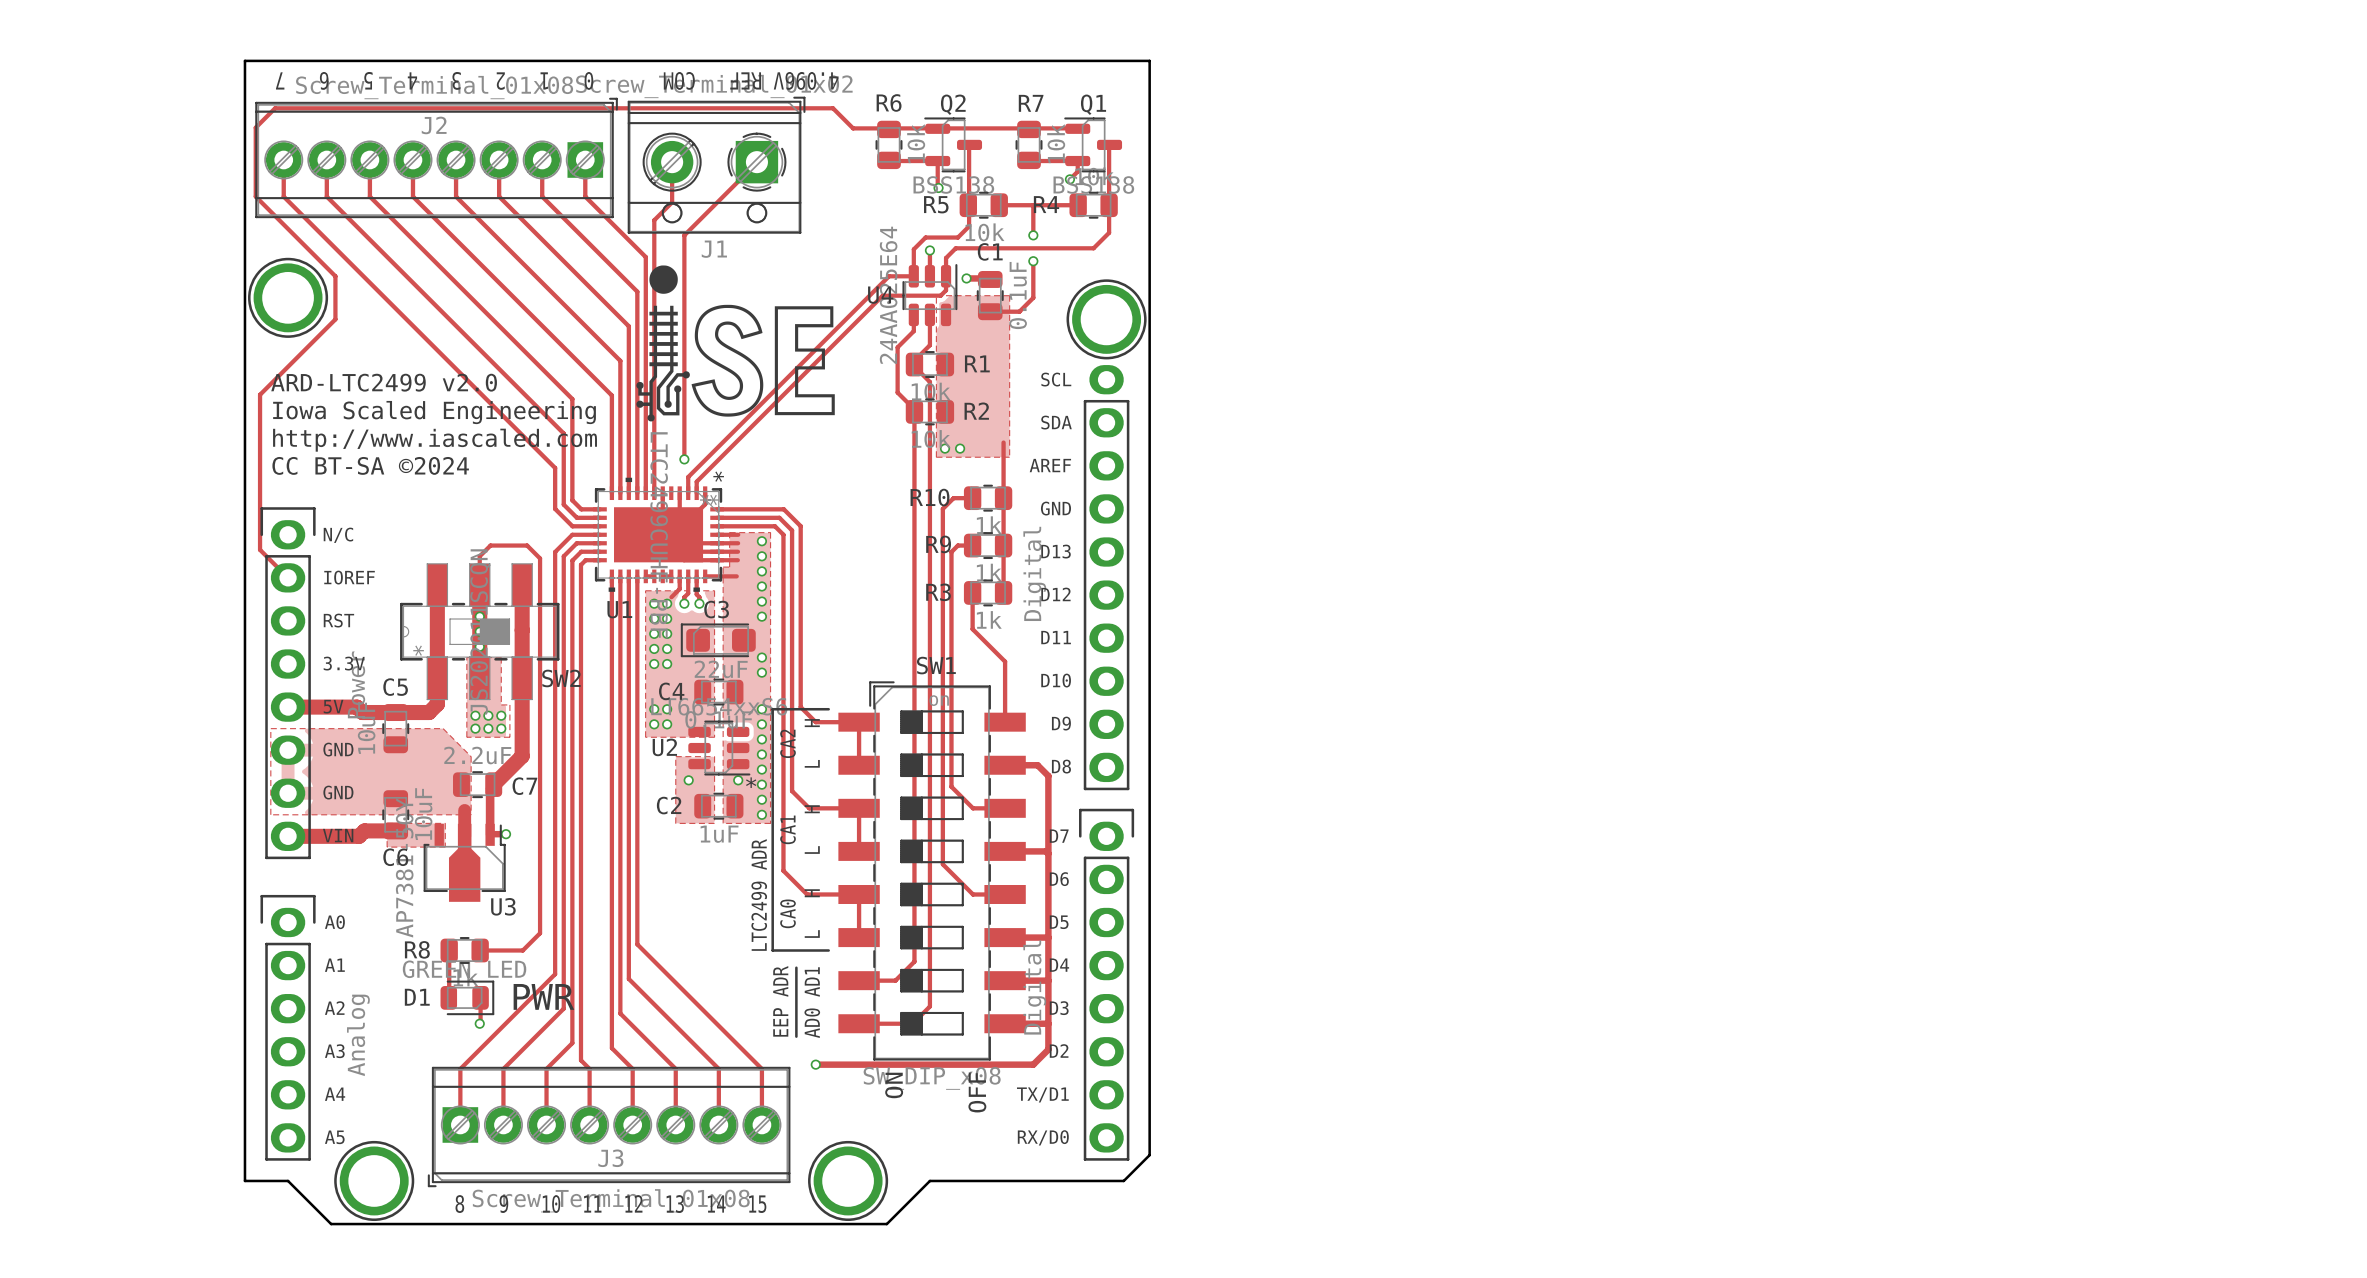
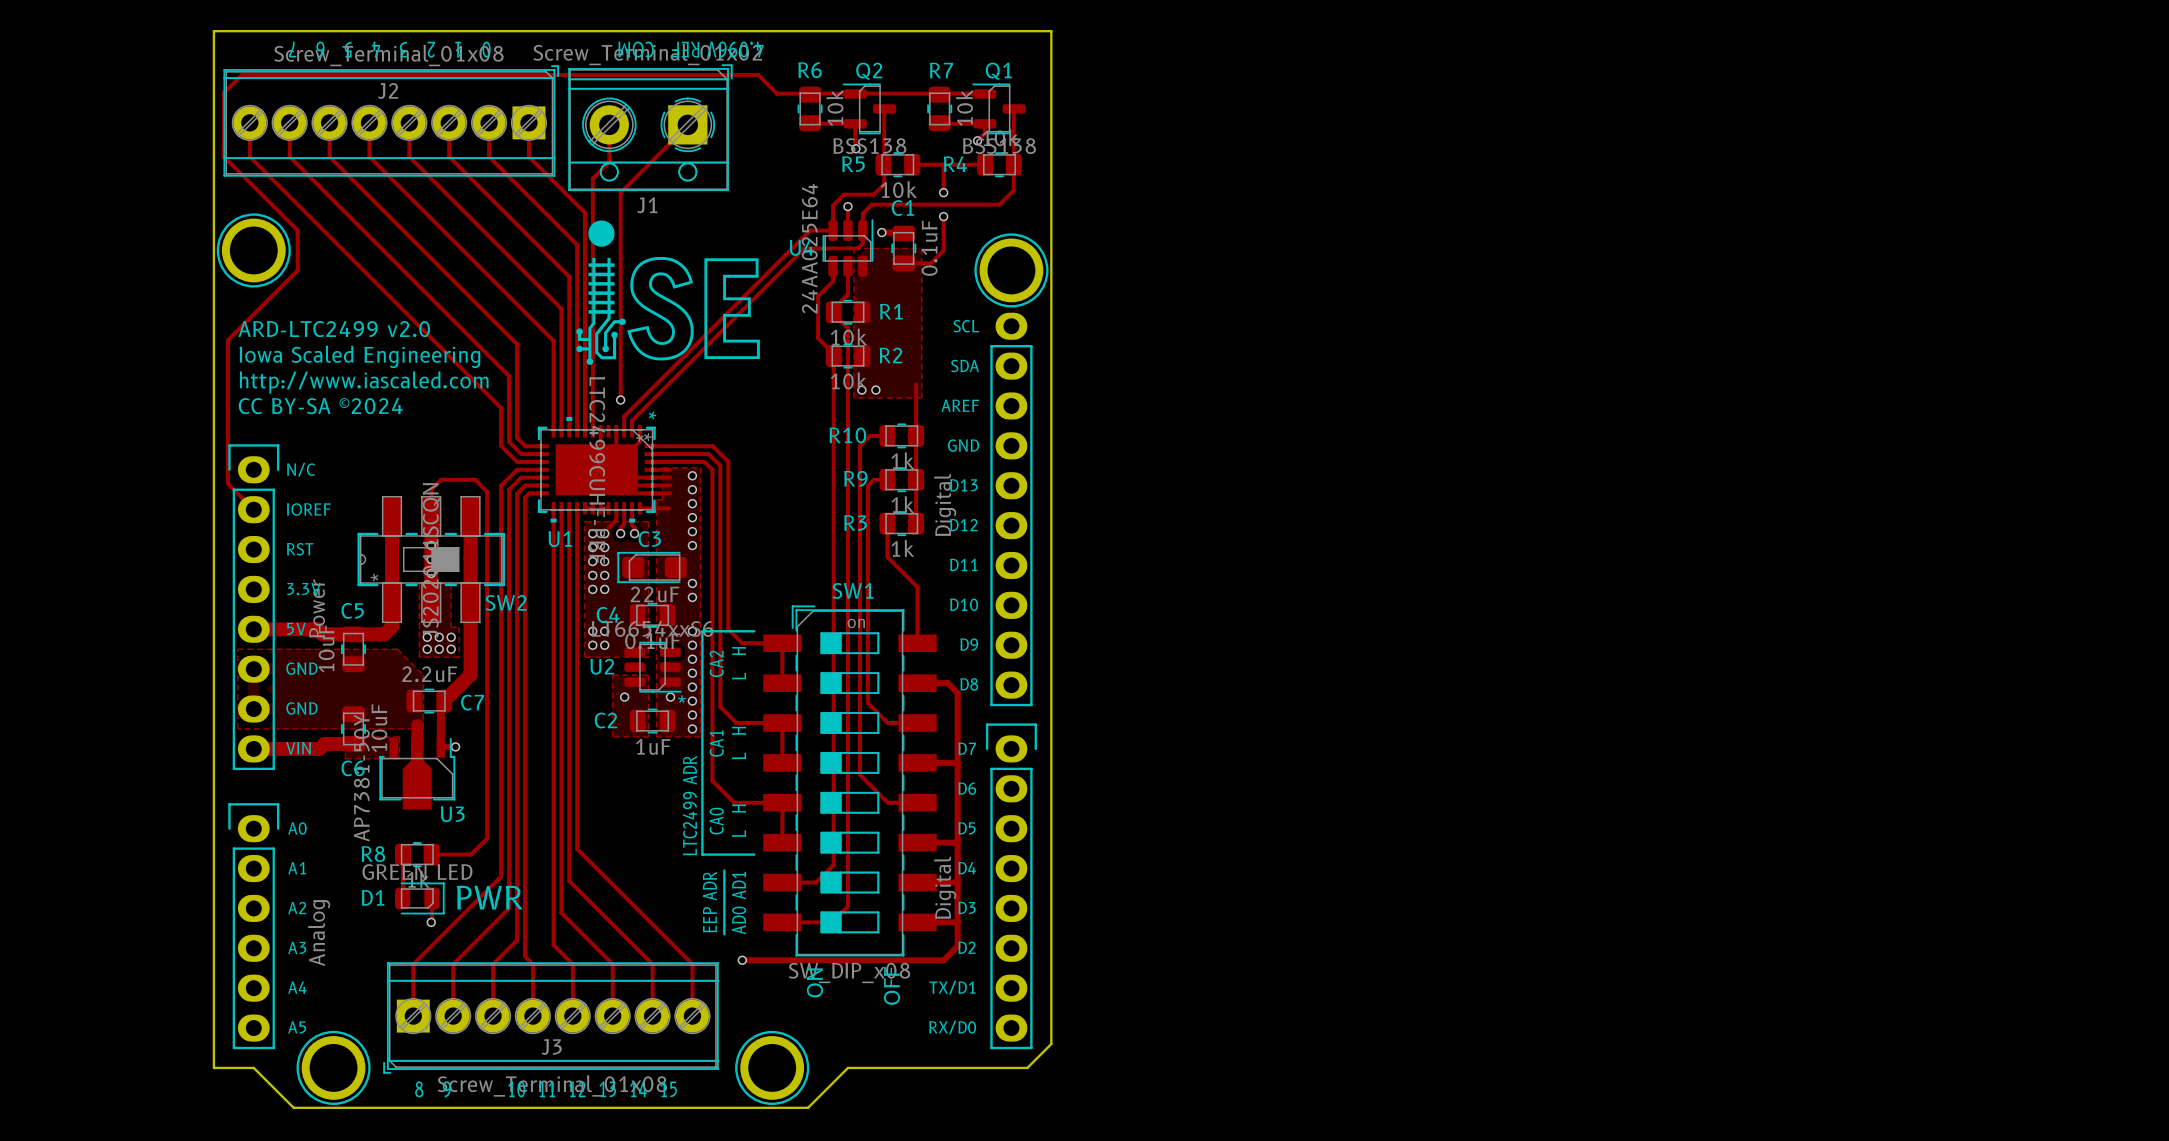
text: CC BT-SA ©2024 (370, 465) -> CC BY-SA ©2024 (320, 406)

